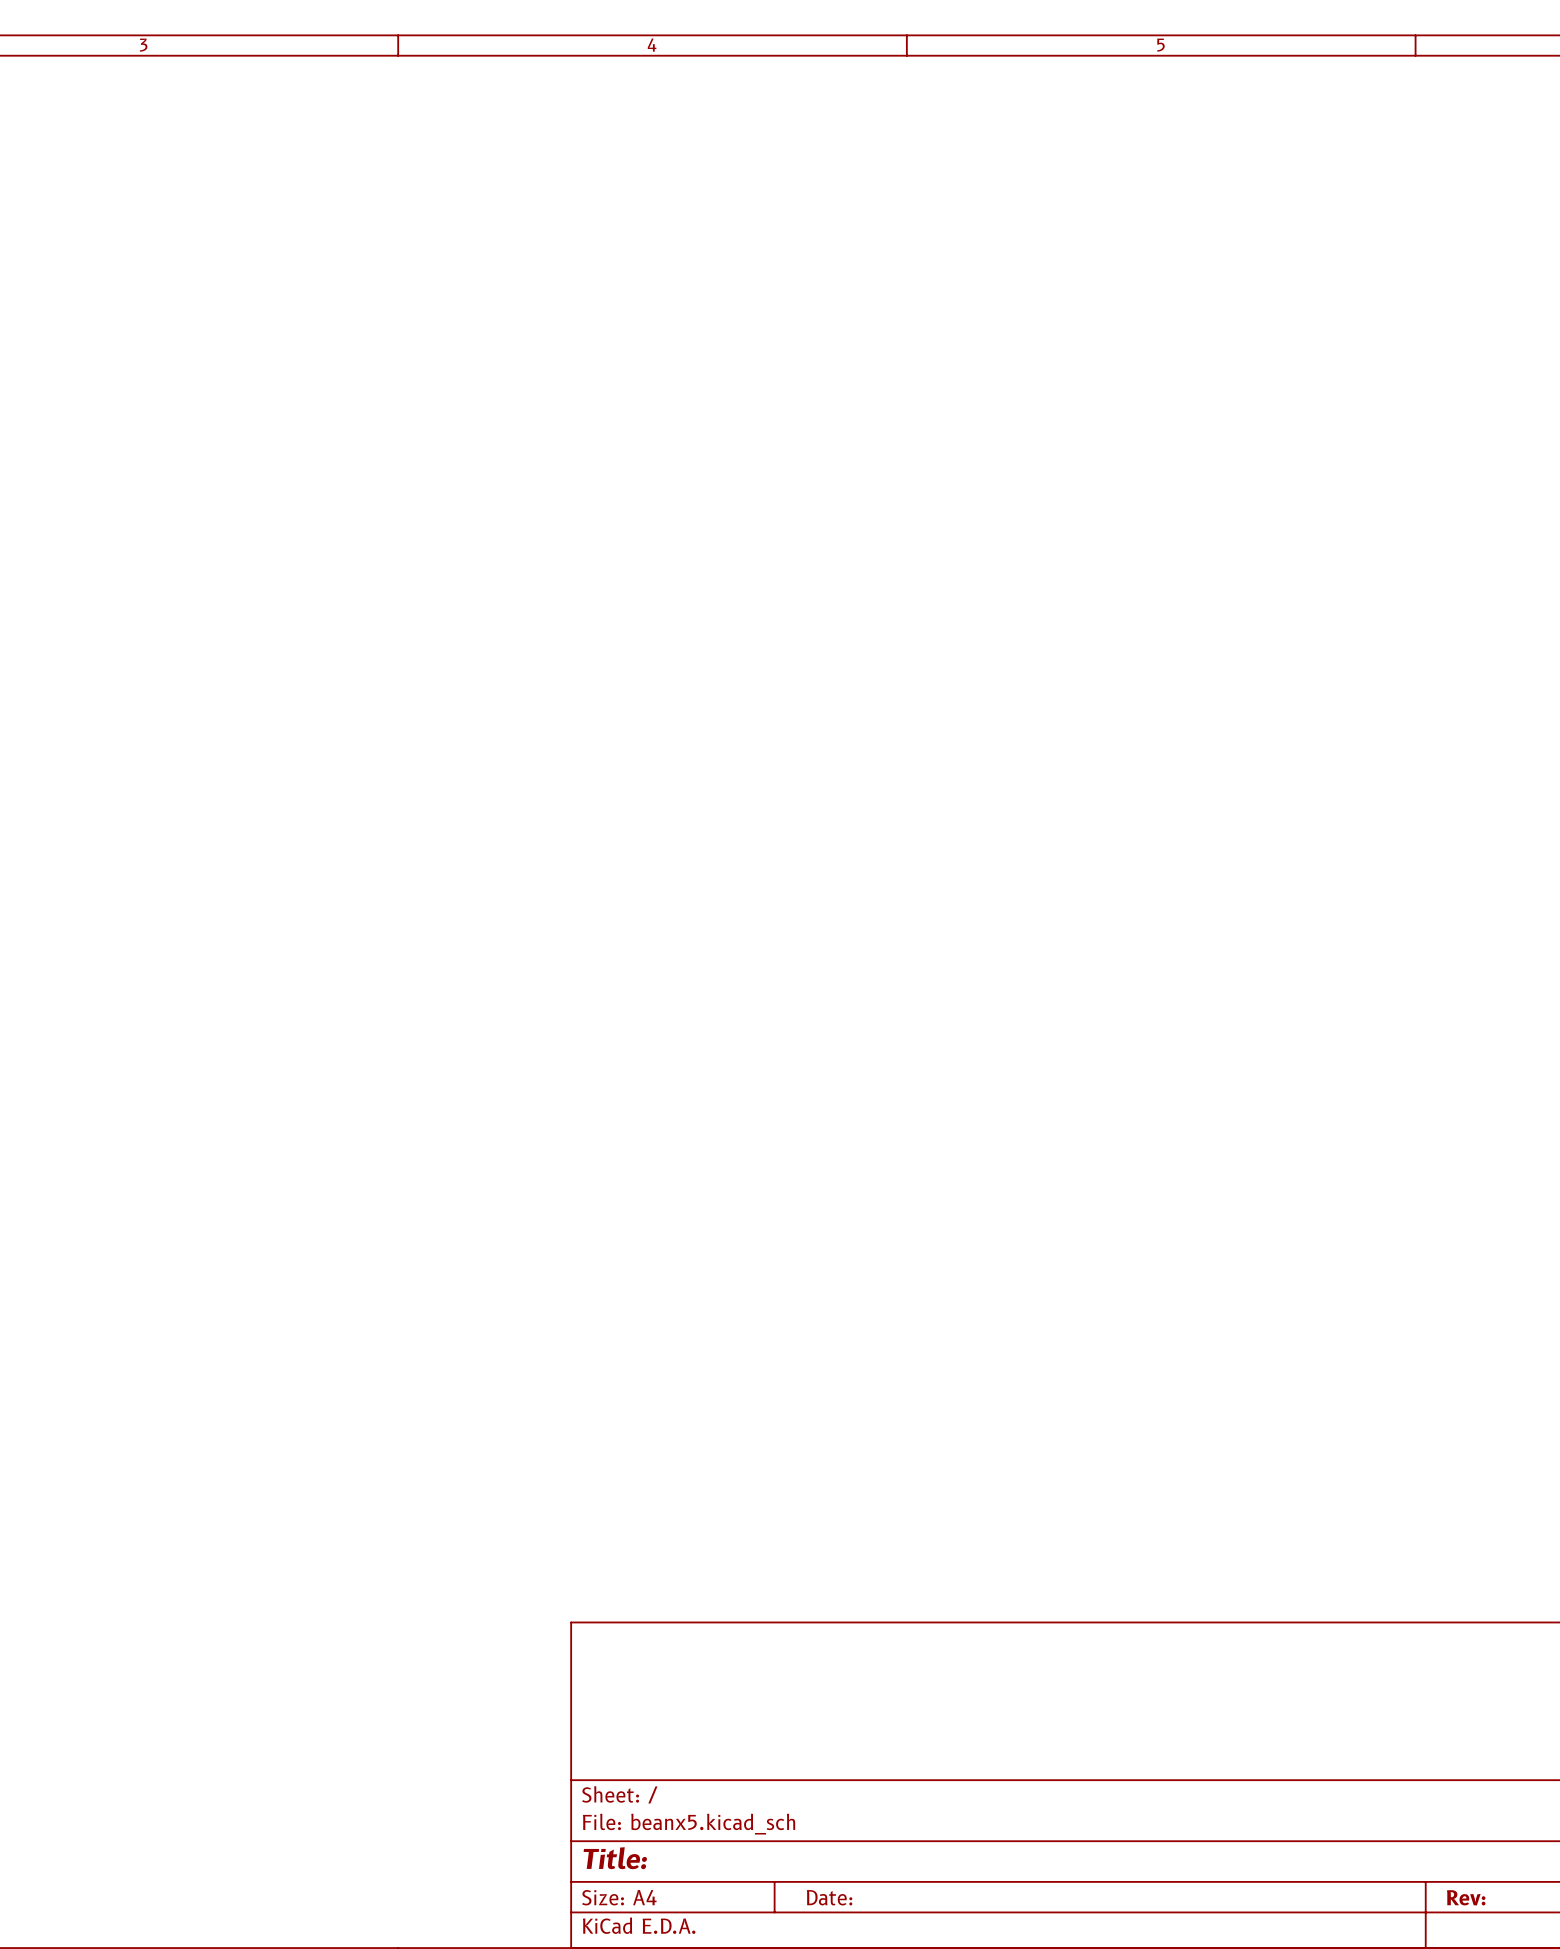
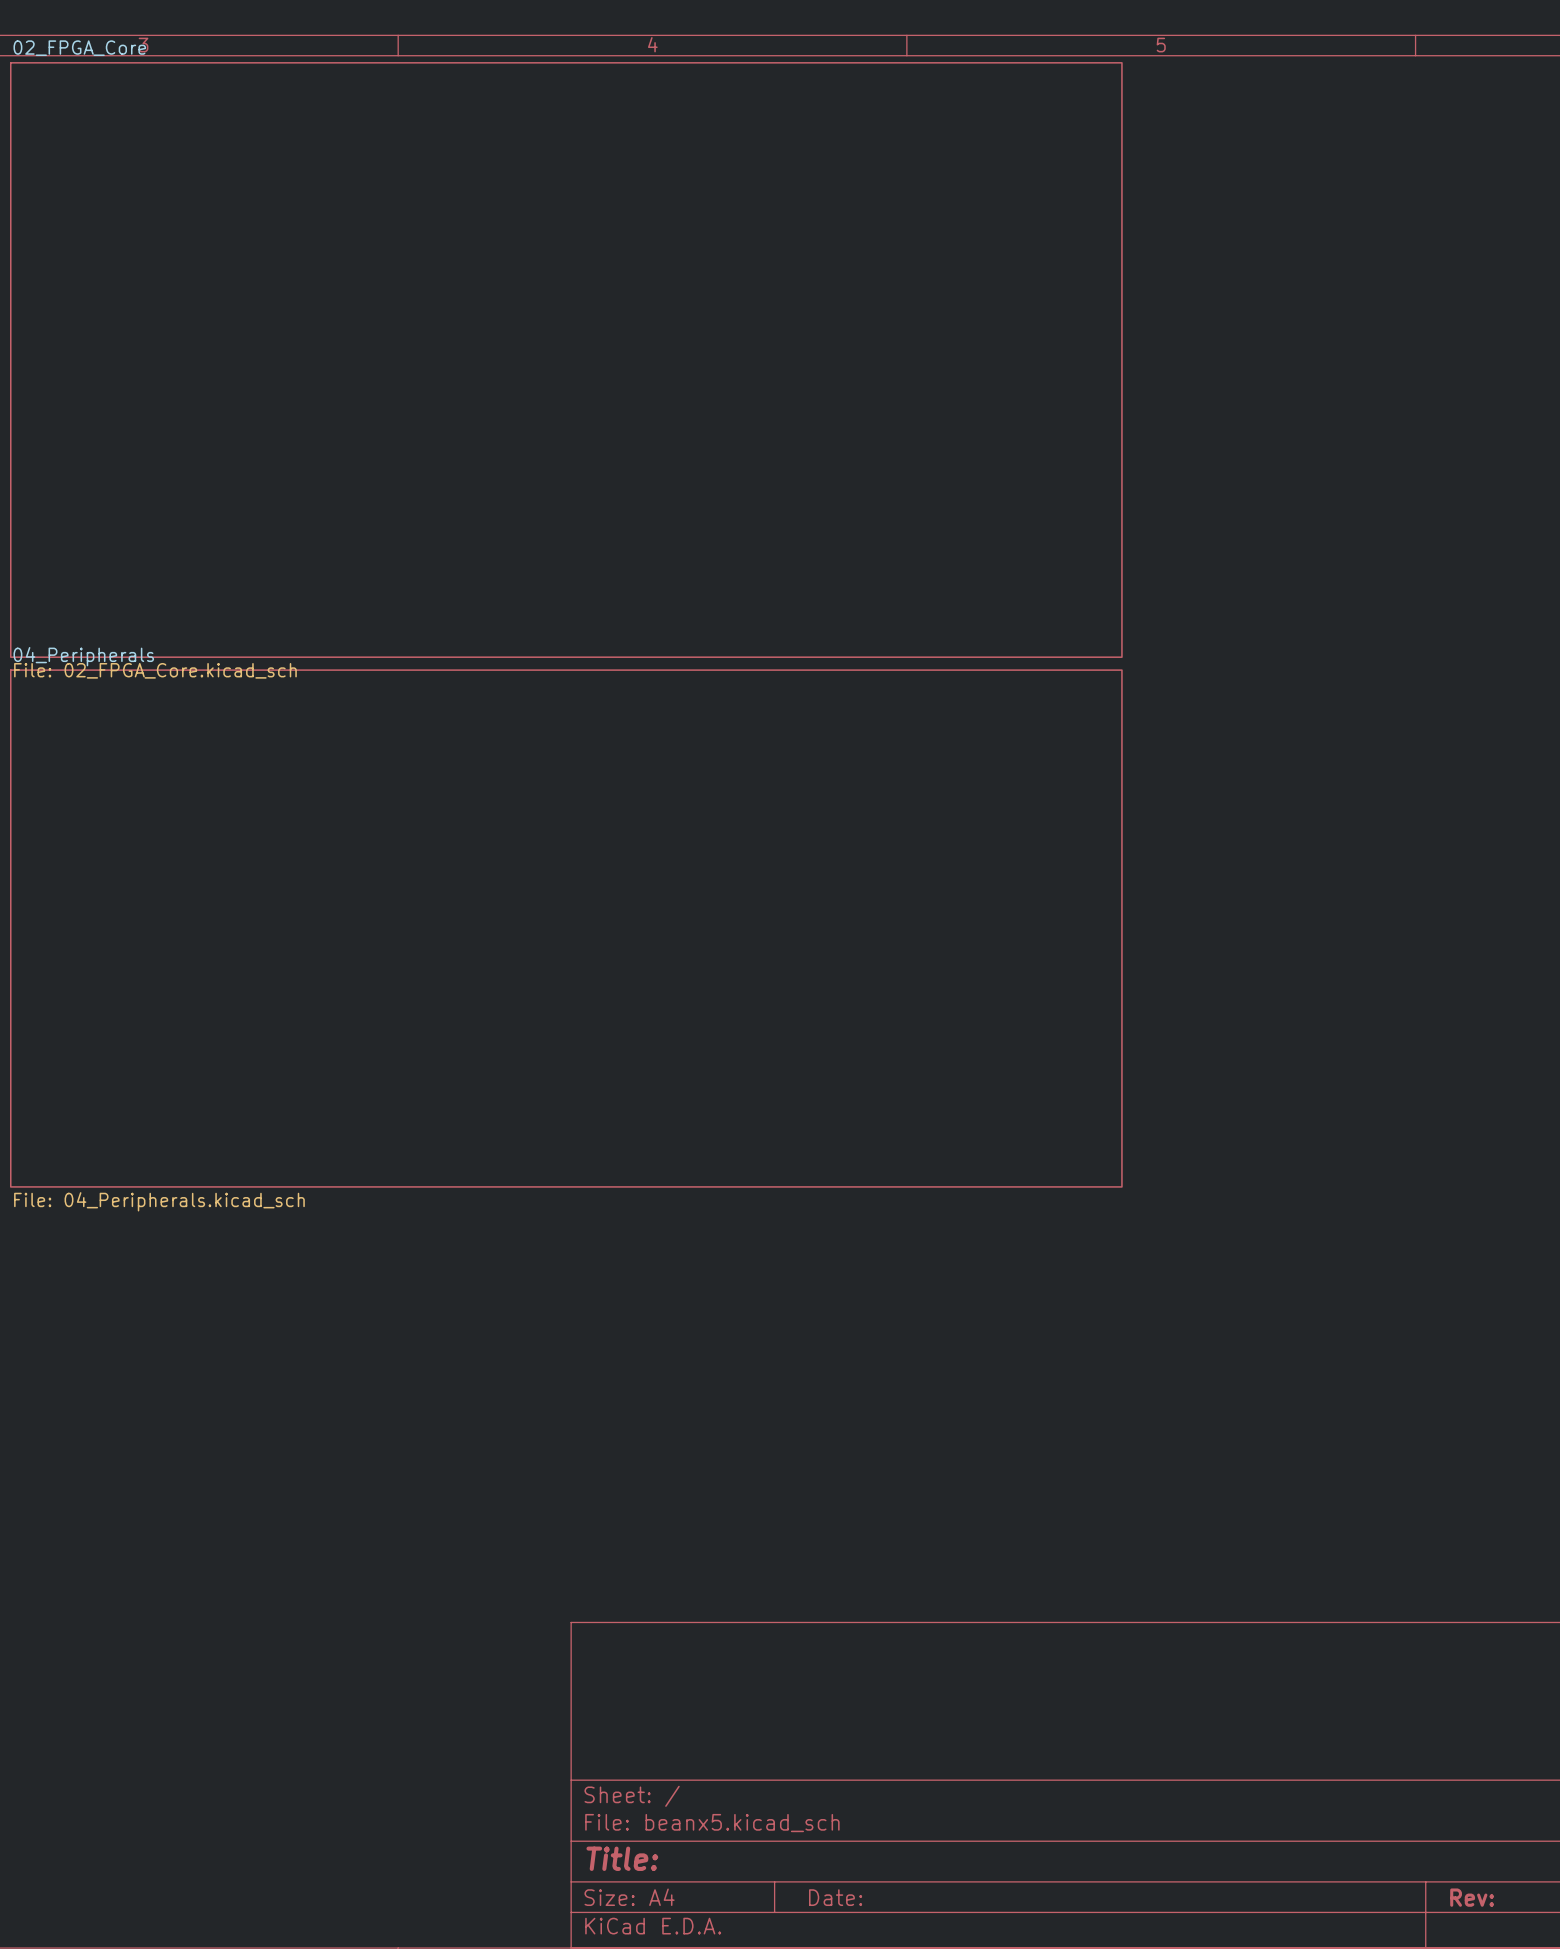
sheet 02_FPGA_Core: none -> File: 02_FPGA_Core.kicad_sch (566, 360)
sheet 04_Peripherals: none -> File: 04_Peripherals.kicad_sch (566, 928)

